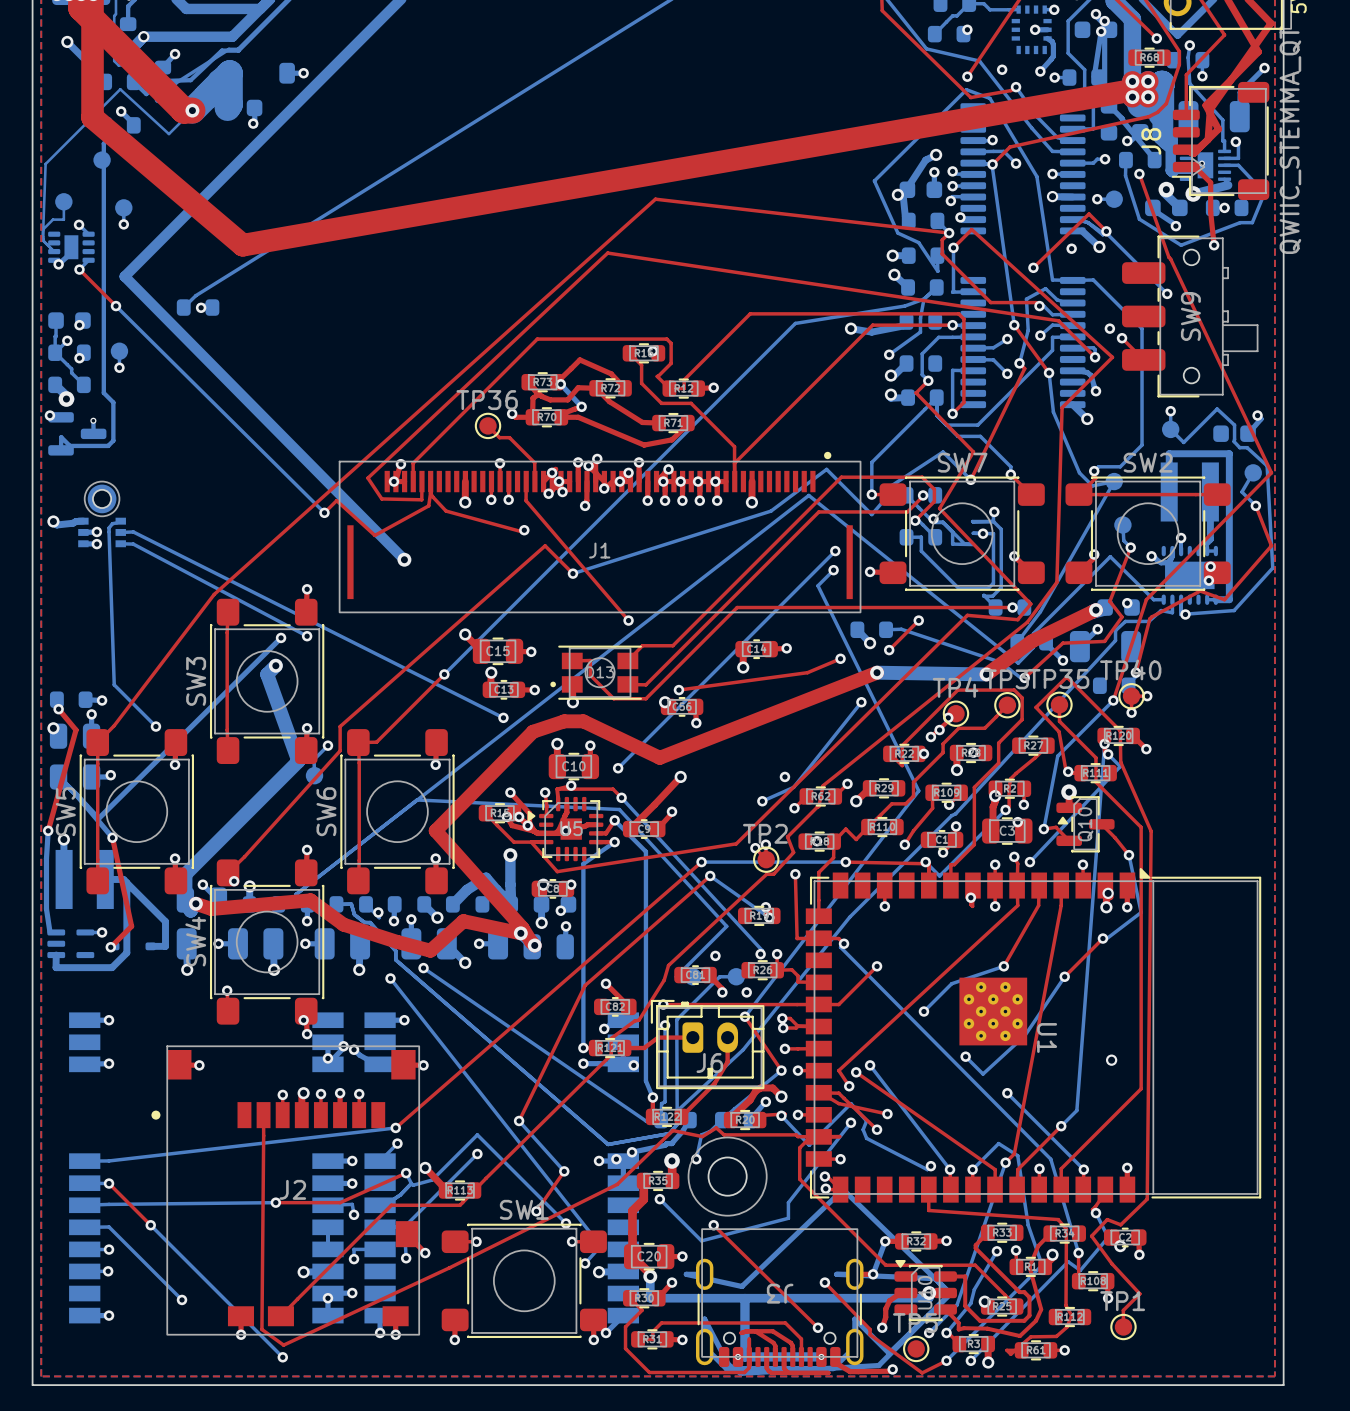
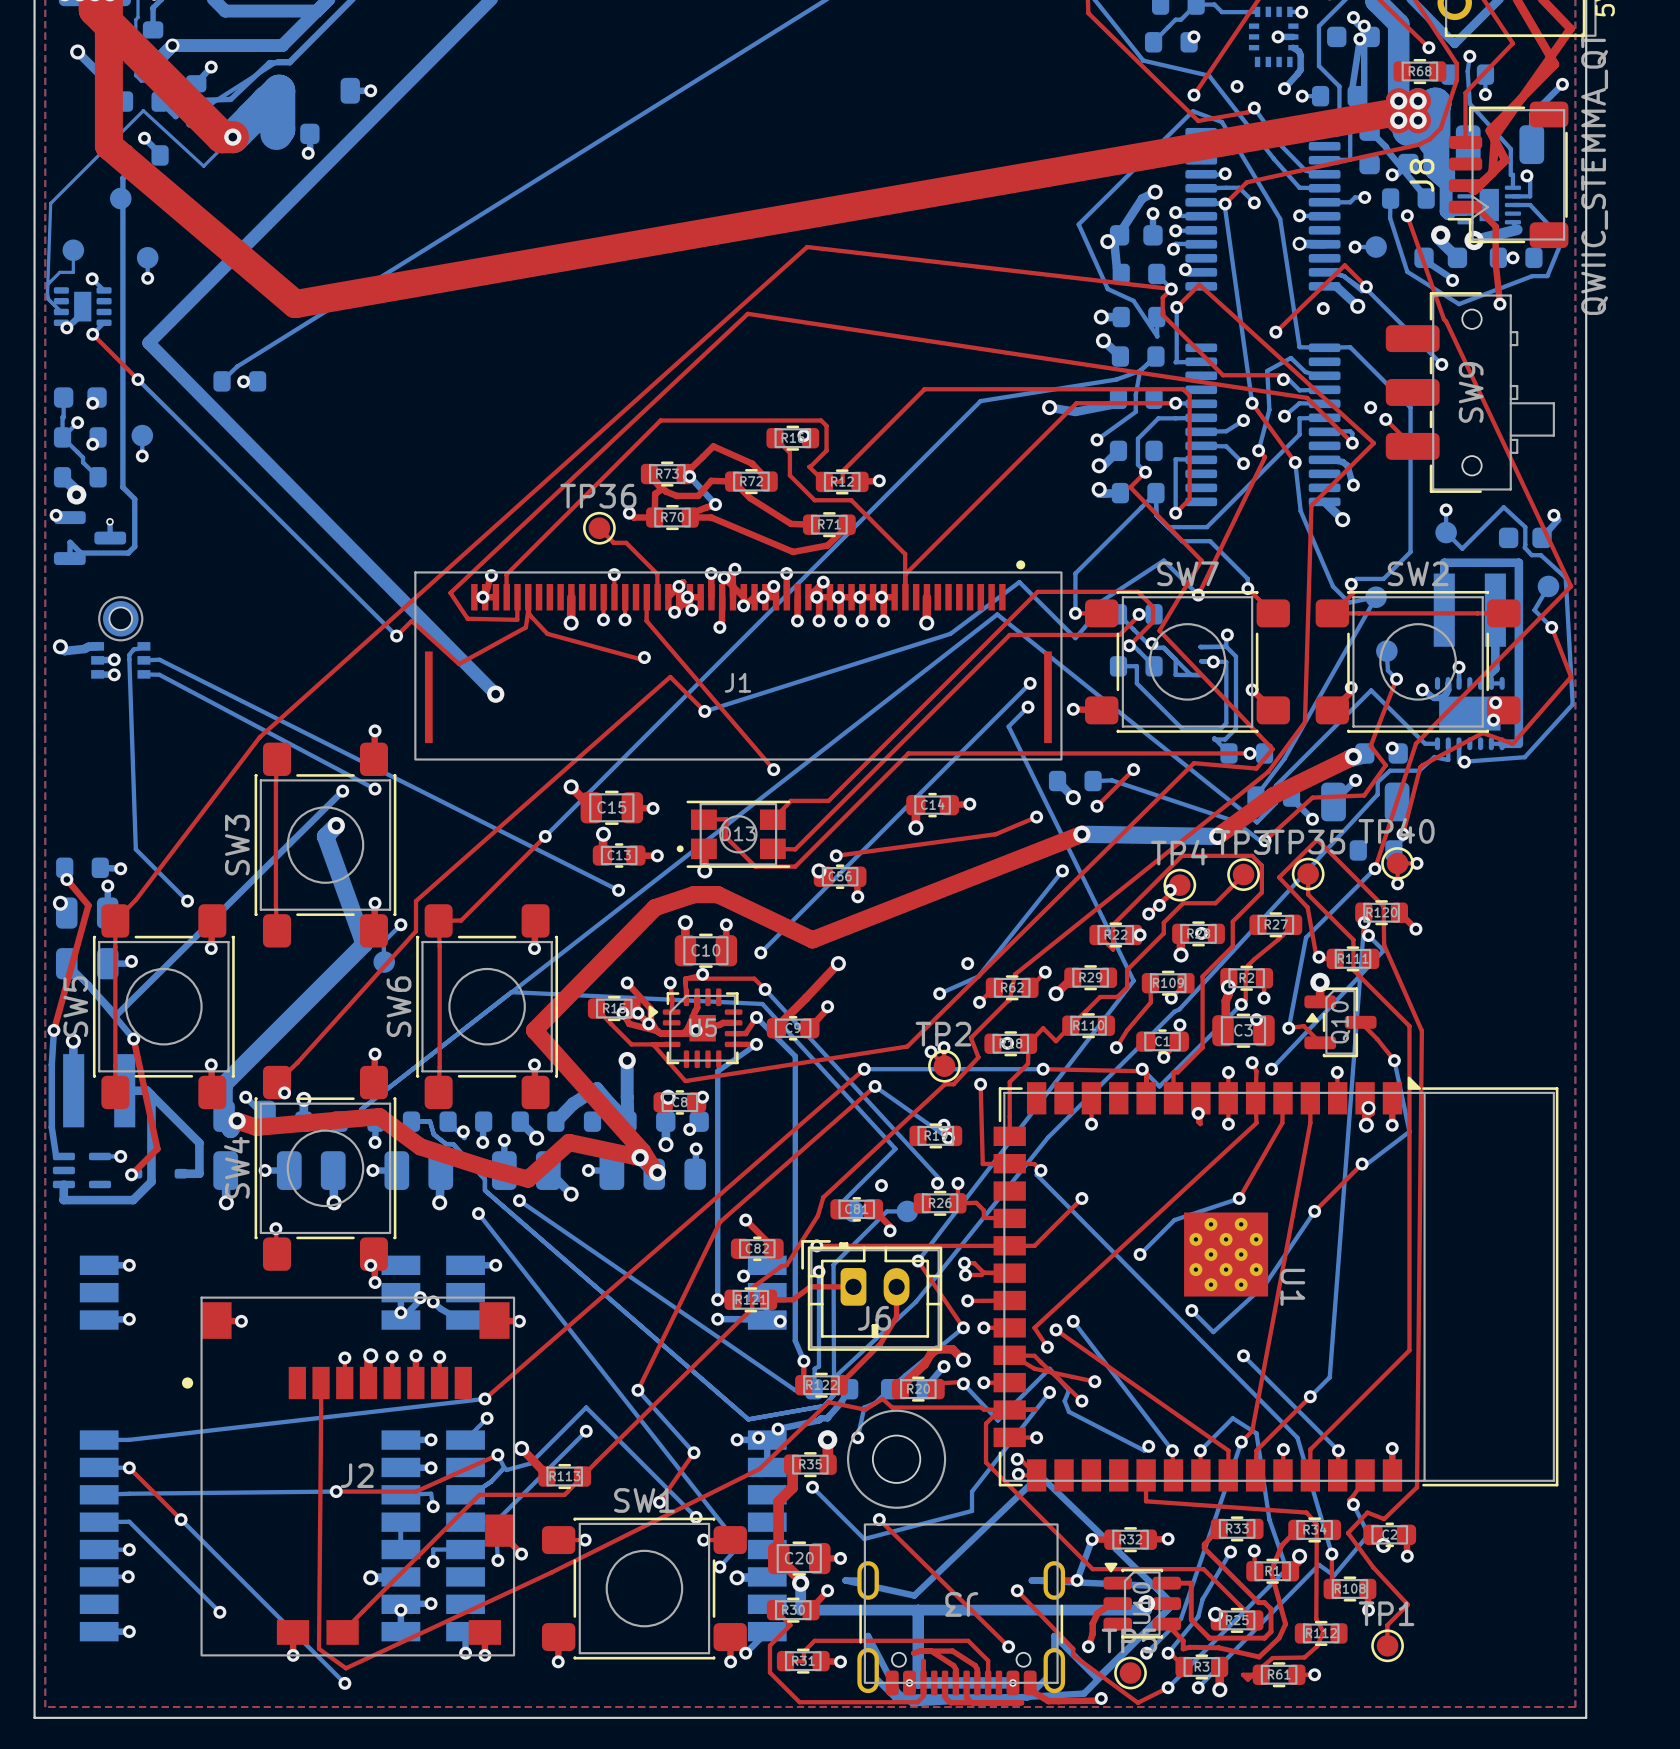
via: (1201, 163) -> none
via: (746, 992) -> none
via: (1111, 1060) -> none

